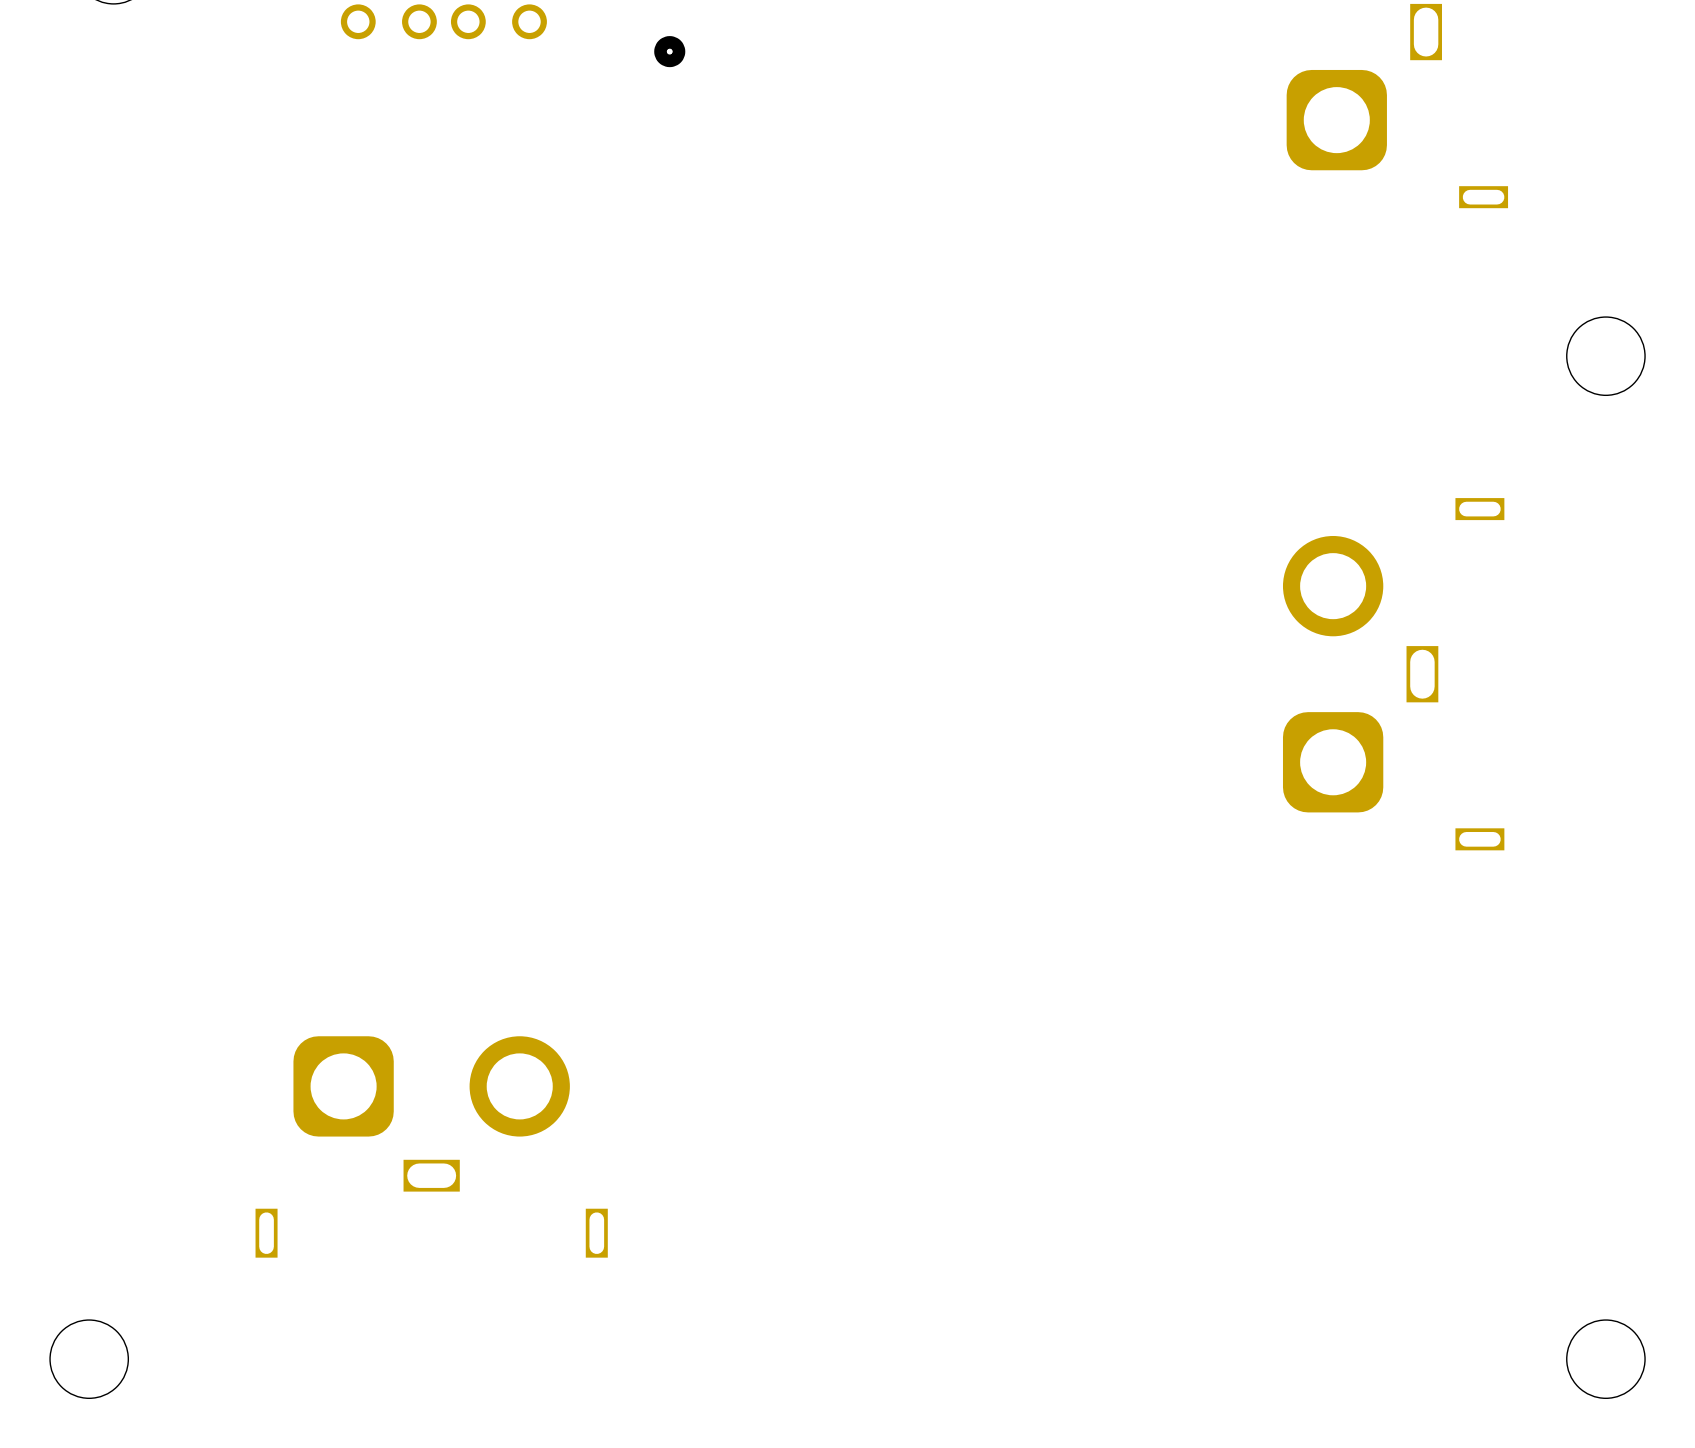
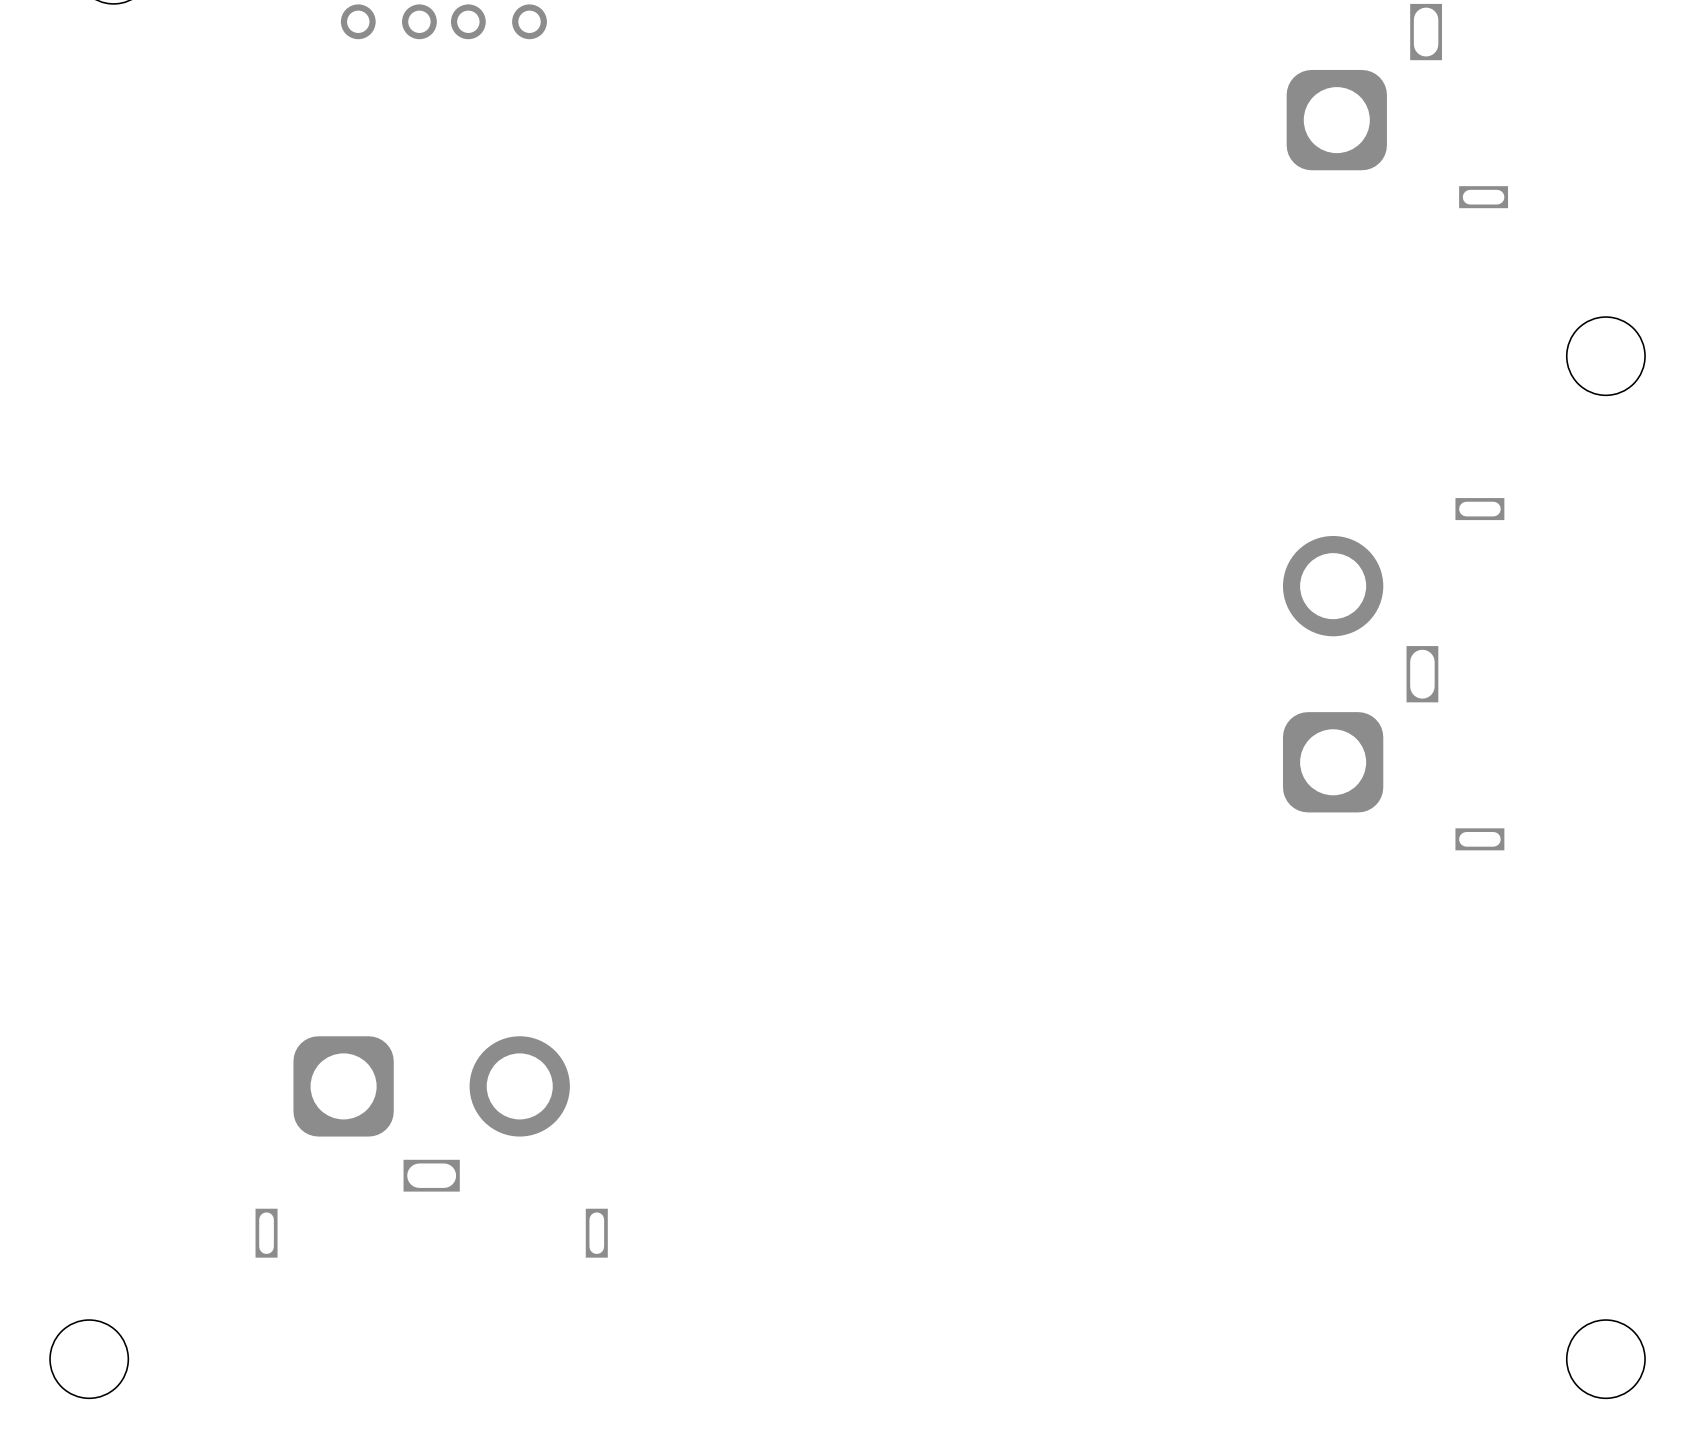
part: (669, 51) -> none

